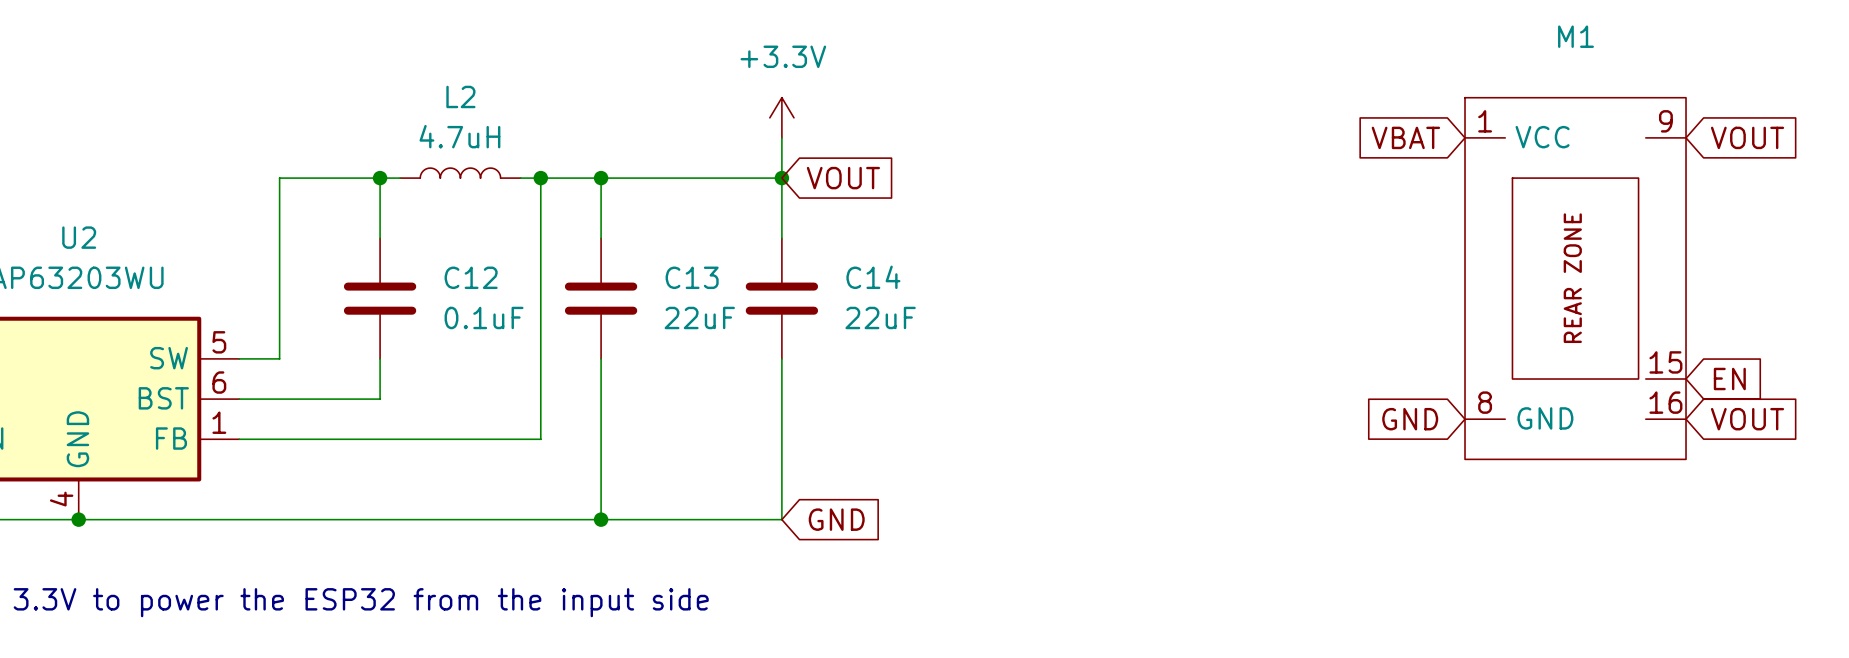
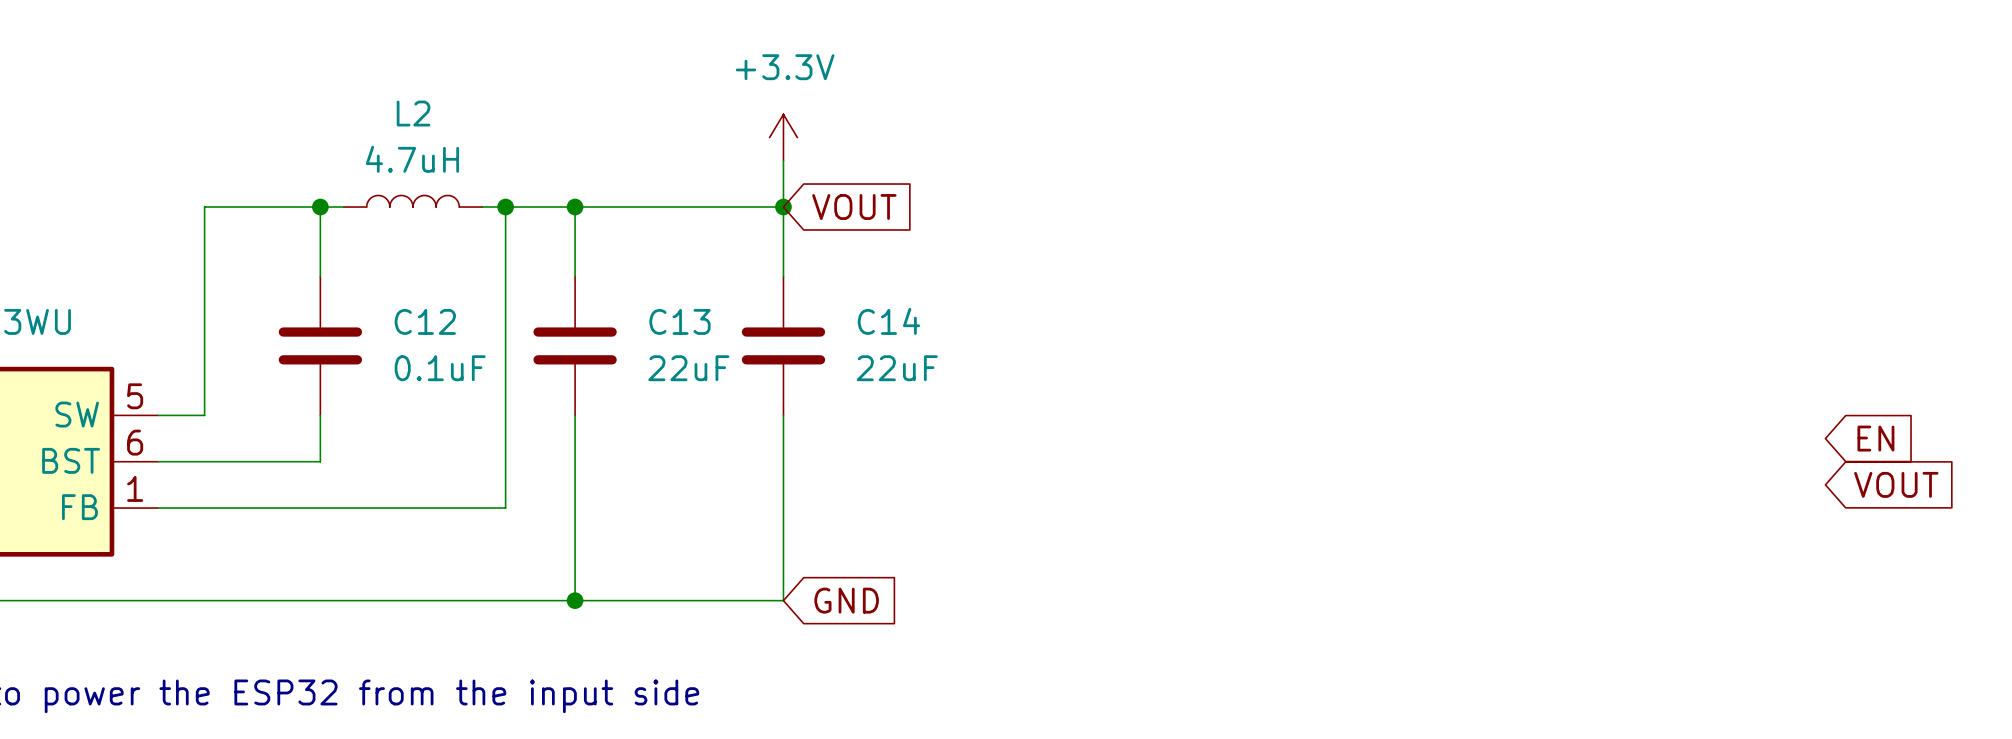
global label: VBAT (1405, 137) -> none
global label: VOUT (1747, 137) -> none
M1: (1575, 278) -> none
global label: GND (1410, 419) -> none

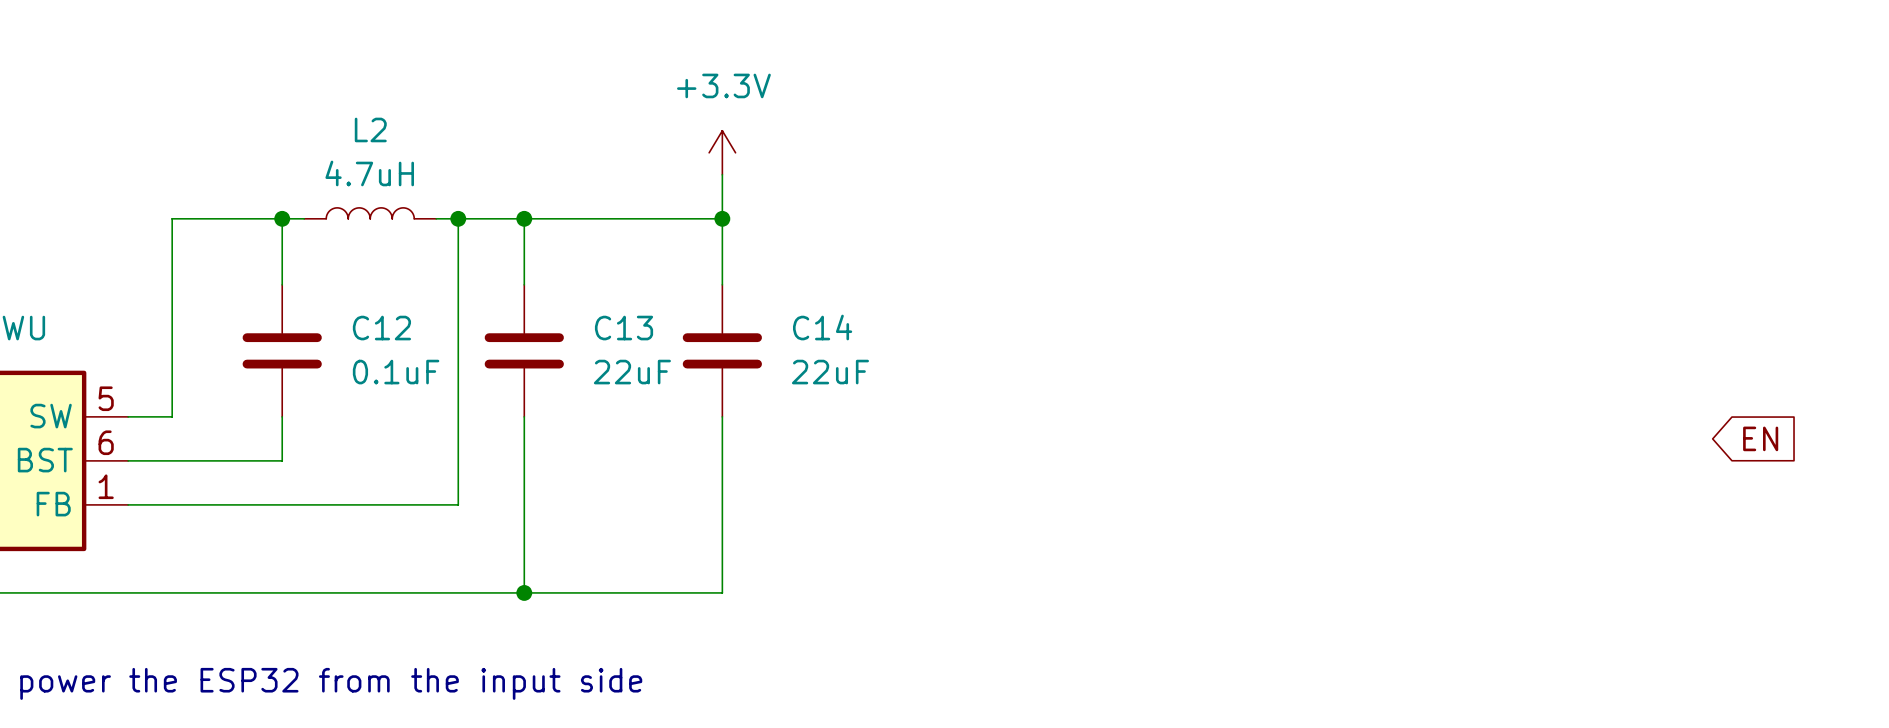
global label: VOUT (854, 207) -> none
global label: VOUT (1896, 484) -> none
global label: GND (846, 600) -> none

